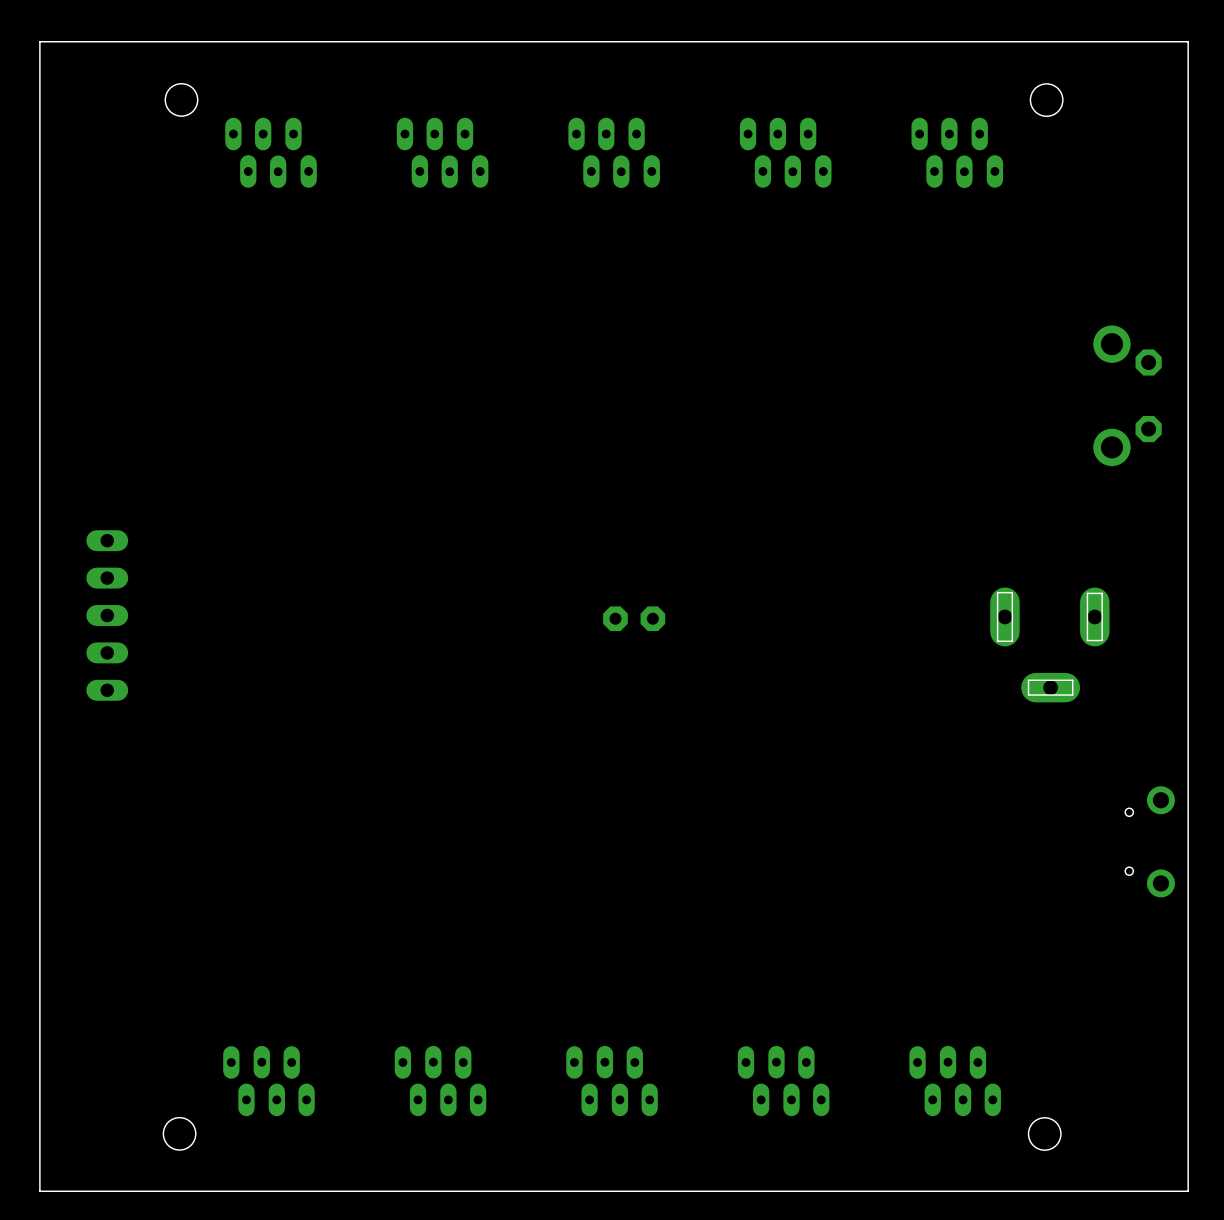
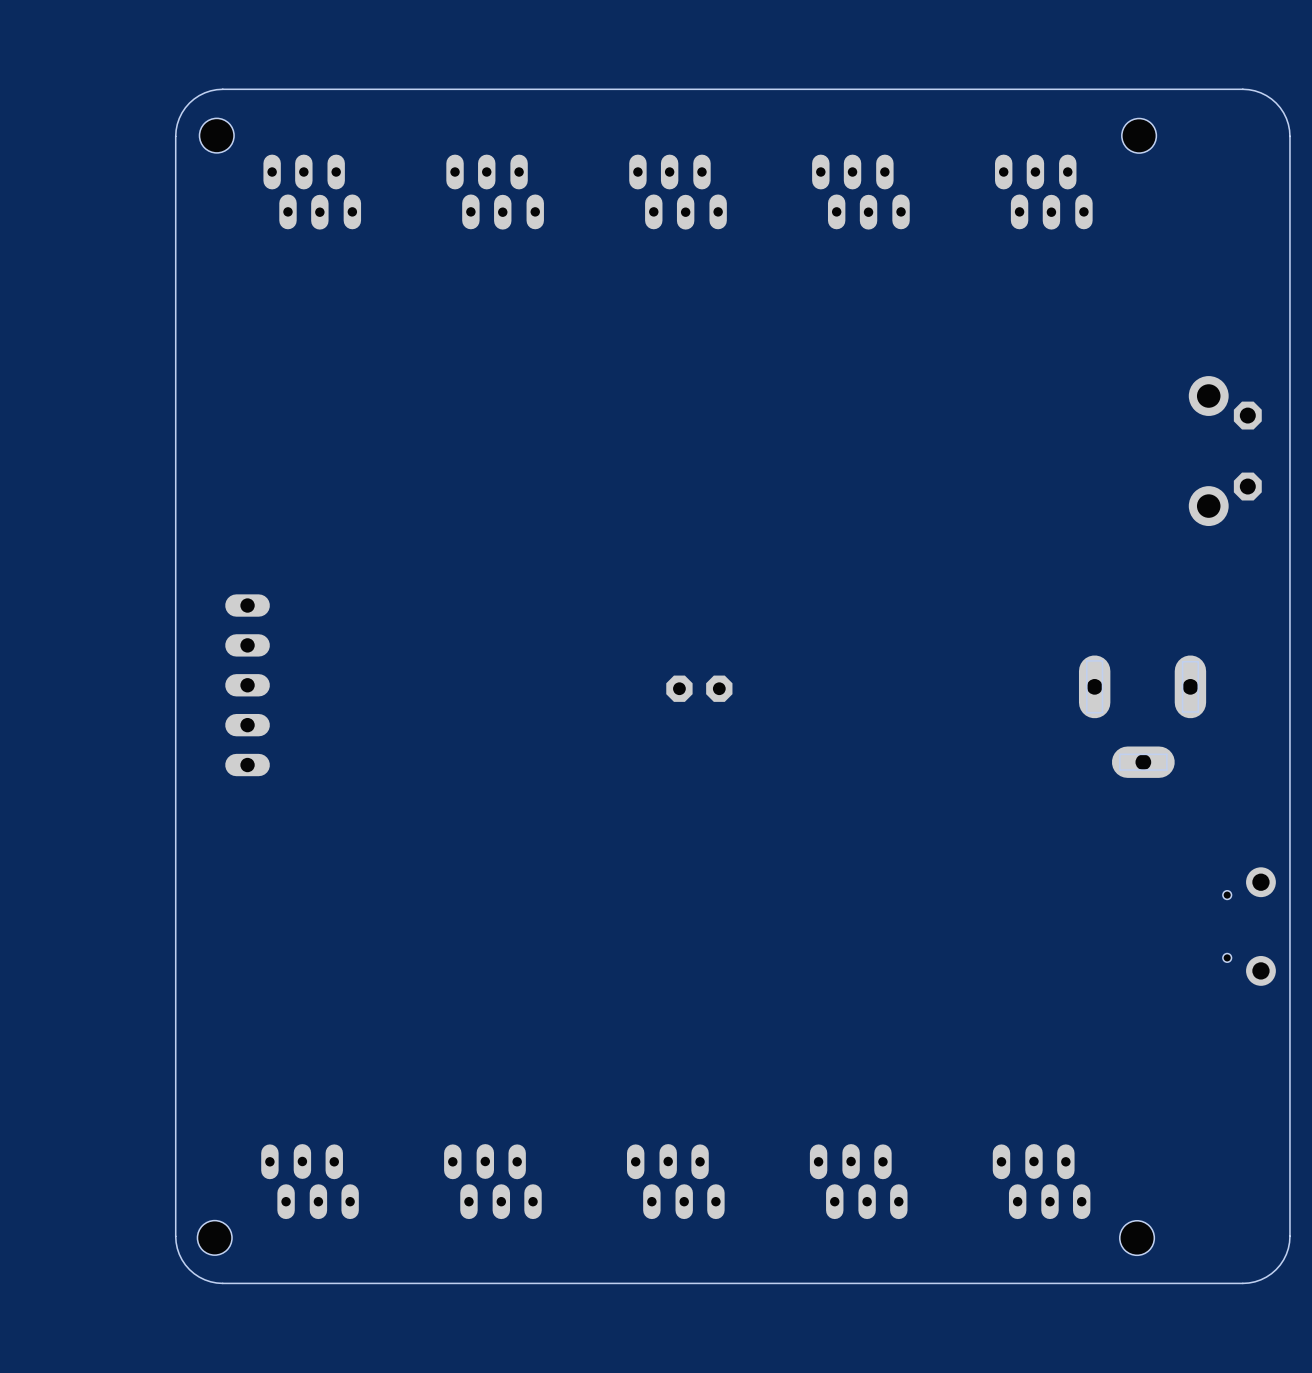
board edge: (1188, 100) (1188, 41) (39, 41) (39, 1191) (1188, 1191) (1188, 1132) -> (1289, 136) (1286, 118) (1276, 103) (1260, 92) (1242, 89) (222, 89) (204, 92) (189, 103) (179, 118) (175, 136) (175, 1236) (179, 1254) (189, 1269) (204, 1279) (222, 1283) (1242, 1283) (1260, 1279) (1276, 1269) (1286, 1254) (1289, 1236)
part position: (107, 615) -> (247, 685)

